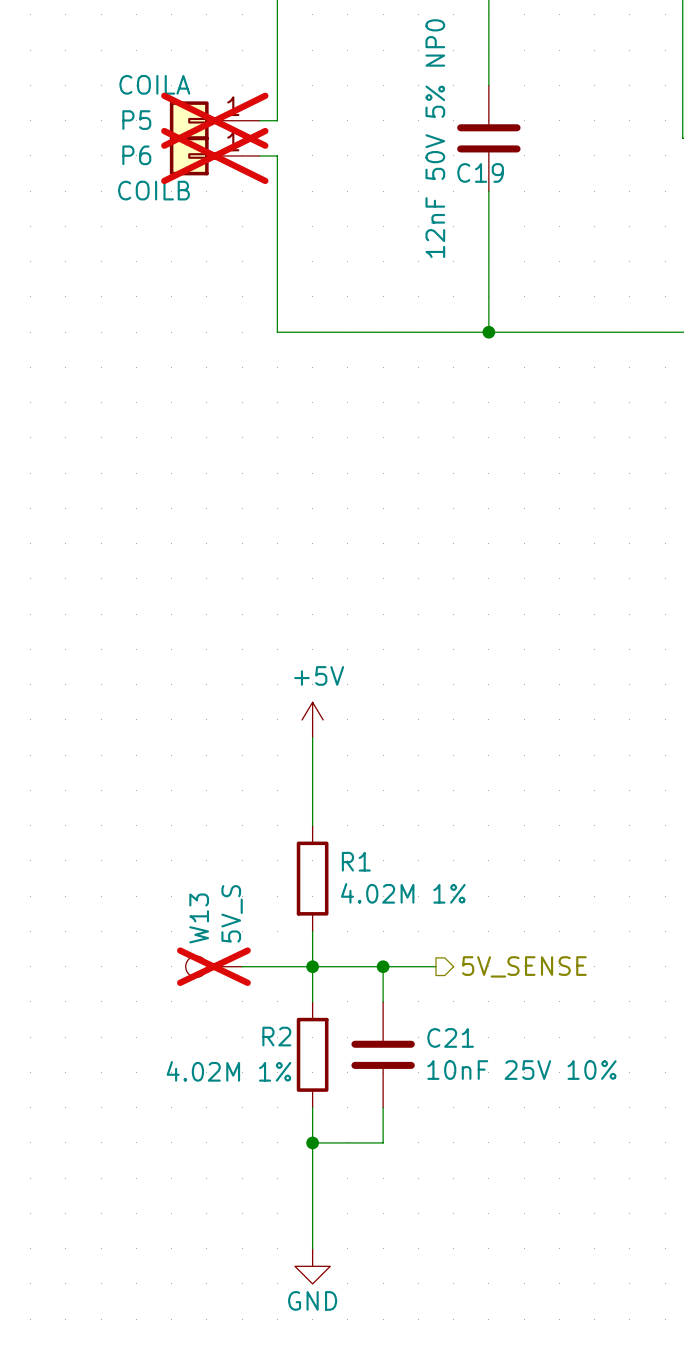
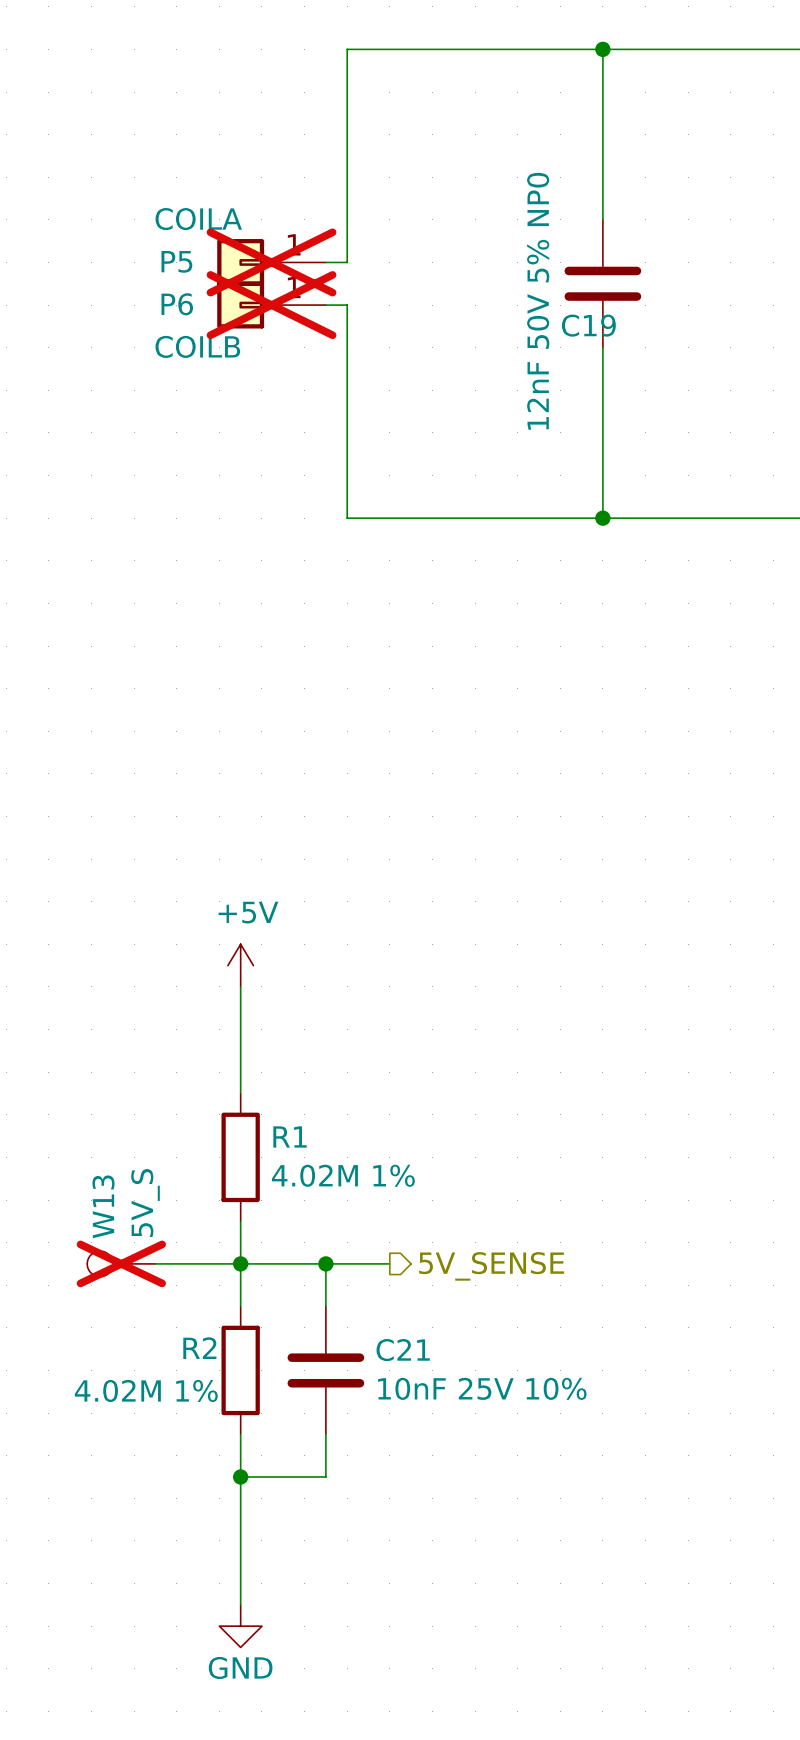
power symbol position: +5V (312, 719) -> +5V (240, 965)
wire: (312, 737) (312, 825) -> (240, 986) (240, 1093)
R1 position: (312, 878) -> (240, 1157)
wire: (312, 931) (312, 1001) -> (240, 1221) (240, 1306)
junction: none -> (240, 1263)
W13 position: (213, 966) -> (121, 1263)
wire: (242, 966) (435, 966) -> (155, 1263) (389, 1263)
junction position: (312, 966) -> (325, 1263)
wire: (383, 966) (383, 1001) -> (325, 1263) (325, 1306)
junction: (383, 966) -> none
hierarchical label position: 5V_SENSE (524, 966) -> 5V_SENSE (491, 1266)
R2 position: (312, 1054) -> (240, 1370)
C21 position: (383, 1054) -> (325, 1370)
wire: (312, 1107) (312, 1248) -> (240, 1434) (240, 1604)
wire: (383, 1107) (383, 1142) (312, 1142) -> (325, 1434) (325, 1476) (240, 1476)
junction: none -> (240, 1476)
junction: (312, 1142) -> none
power symbol position: GND (312, 1266) -> GND (240, 1626)

